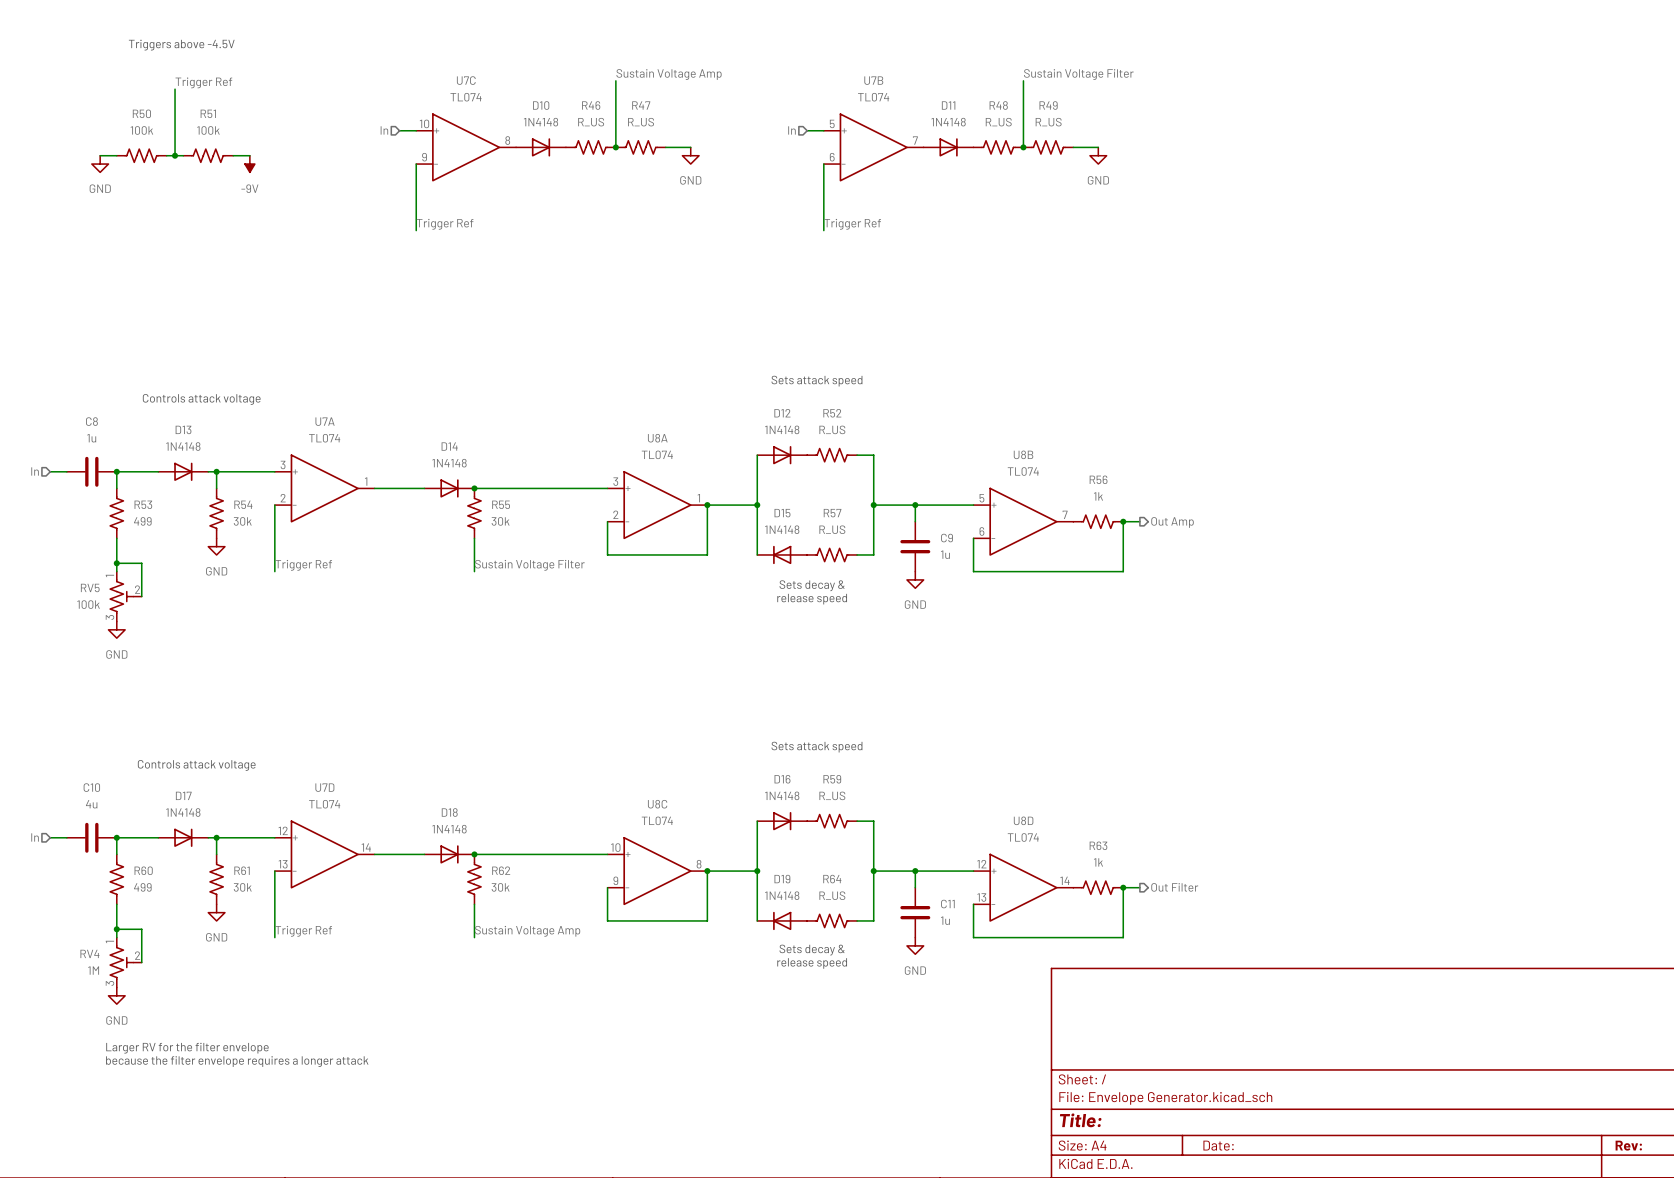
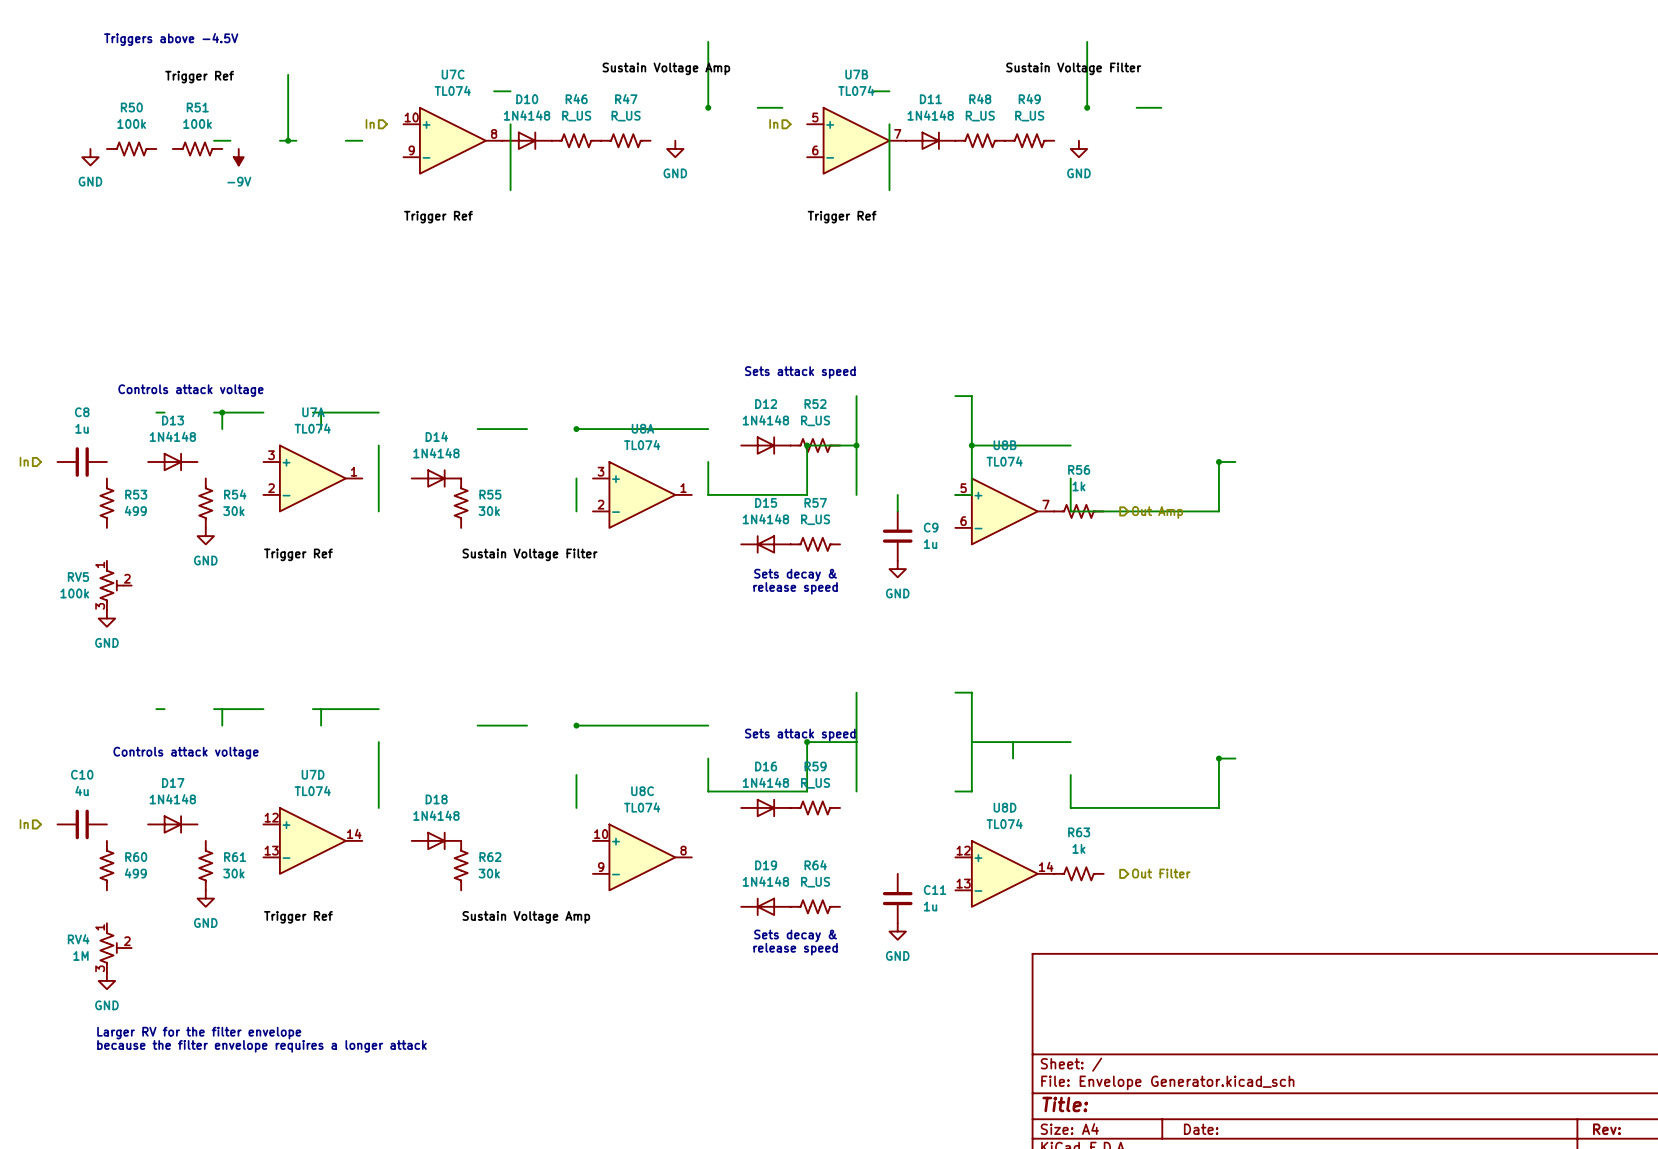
wire: (615, 80) (615, 147) -> (708, 41) (708, 107)
wire: (1023, 80) (1023, 147) -> (1087, 41) (1087, 107)
wire: (175, 89) (175, 155) -> (288, 74) (288, 140)
junction: none -> (708, 107)
junction: none -> (1087, 107)
wire: (399, 130) (416, 130) -> (494, 91) (510, 91)
wire: (807, 130) (823, 130) -> (873, 91) (889, 91)
junction: none -> (288, 140)
junction: (615, 147) -> none
wire: (665, 147) (690, 147) -> (757, 107) (782, 107)
junction: (1023, 147) -> none
wire: (1073, 147) (1098, 147) -> (1136, 107) (1161, 107)
wire: (100, 155) (116, 155) -> (214, 140) (230, 140)
wire: (166, 155) (183, 155) -> (279, 140) (296, 140)
junction: (175, 155) -> none
wire: (233, 155) (249, 155) -> (345, 140) (362, 140)
wire: (416, 164) (416, 230) -> (510, 124) (510, 190)
wire: (823, 164) (823, 230) -> (889, 124) (889, 190)
wire: none -> (856, 396) (856, 445)
wire: none -> (156, 412) (164, 412)
wire: none -> (214, 412) (263, 412)
wire: none -> (222, 412) (222, 429)
junction: none -> (222, 412)
junction: none -> (576, 429)
wire: (757, 455) (757, 554) -> none
junction: none -> (807, 445)
wire: none -> (840, 445) (807, 445) (807, 494) (741, 494)
junction: none -> (856, 445)
wire: none -> (971, 445) (1070, 445)
junction: none -> (971, 445)
wire: (50, 471) (66, 471) -> none
junction: (116, 471) -> none
wire: (158, 471) (116, 471) (116, 488) -> none
wire: (208, 471) (274, 471) -> (312, 412) (378, 412)
wire: (216, 471) (216, 488) -> (321, 412) (321, 429)
junction: (216, 471) -> none
junction: none -> (1218, 462)
wire: none -> (1235, 462) (1218, 462) (1218, 511) (1120, 511)
wire: (374, 488) (424, 488) -> (477, 429) (527, 429)
wire: (474, 488) (607, 488) -> (576, 429) (708, 429)
junction: (474, 488) -> none
wire: (274, 505) (274, 571) -> (378, 445) (378, 511)
junction: (707, 505) -> none
wire: (724, 505) (707, 505) (707, 554) (607, 554) (607, 521) -> (708, 494) (708, 462)
junction: (757, 505) -> none
junction: (873, 505) -> none
junction: (915, 505) -> none
wire: (973, 505) (873, 505) (873, 554) (857, 554) -> (955, 494) (971, 494) (971, 396) (955, 396)
wire: (1123, 521) (1123, 571) (973, 571) (973, 538) -> (1103, 511) (1070, 511) (1070, 478)
junction: (1123, 521) -> none
wire: (116, 538) (116, 571) -> none
wire: (474, 538) (474, 571) -> (576, 478) (576, 511)
wire: (116, 563) (141, 563) (141, 596) -> none
junction: (116, 563) -> none
wire: none -> (856, 692) (856, 791)
wire: none -> (955, 692) (971, 692) (971, 791) (955, 791)
wire: none -> (156, 709) (164, 709)
wire: none -> (214, 709) (263, 709)
wire: none -> (312, 709) (378, 709)
wire: none -> (321, 709) (321, 725)
wire: none -> (477, 725) (527, 725)
wire: none -> (576, 725) (708, 725)
junction: none -> (576, 725)
wire: none -> (378, 742) (378, 807)
junction: none -> (807, 742)
wire: none -> (856, 742) (807, 742) (807, 791) (708, 791) (708, 758)
wire: none -> (971, 742) (1070, 742)
wire: none -> (1013, 742) (1013, 758)
junction: none -> (1218, 758)
wire: none -> (1235, 758) (1218, 758) (1218, 807) (1070, 807) (1070, 775)
wire: none -> (576, 775) (576, 807)
wire: (757, 821) (757, 920) -> none
wire: (857, 821) (873, 821) (873, 920) (857, 920) -> none
wire: (50, 837) (66, 837) -> none
junction: (116, 837) -> none
wire: (158, 837) (116, 837) (116, 854) -> none
wire: (208, 837) (274, 837) -> none
wire: (216, 837) (216, 854) -> (222, 709) (222, 725)
junction: (216, 837) -> none
wire: (374, 854) (424, 854) -> none
wire: (474, 854) (607, 854) -> none
junction: (474, 854) -> none
wire: (274, 871) (274, 937) -> none
junction: (707, 871) -> none
wire: (757, 871) (707, 871) (707, 920) (607, 920) (607, 887) -> none
junction: (757, 871) -> none
wire: (873, 871) (973, 871) -> none
junction: (873, 871) -> none
wire: (915, 871) (915, 887) -> none
junction: (915, 871) -> none
junction: (1123, 887) -> none
wire: (1139, 887) (1123, 887) (1123, 937) (973, 937) (973, 904) -> none
wire: (116, 904) (116, 937) -> none
wire: (474, 904) (474, 937) -> none
wire: (116, 929) (141, 929) (141, 962) -> none
junction: (116, 929) -> none

